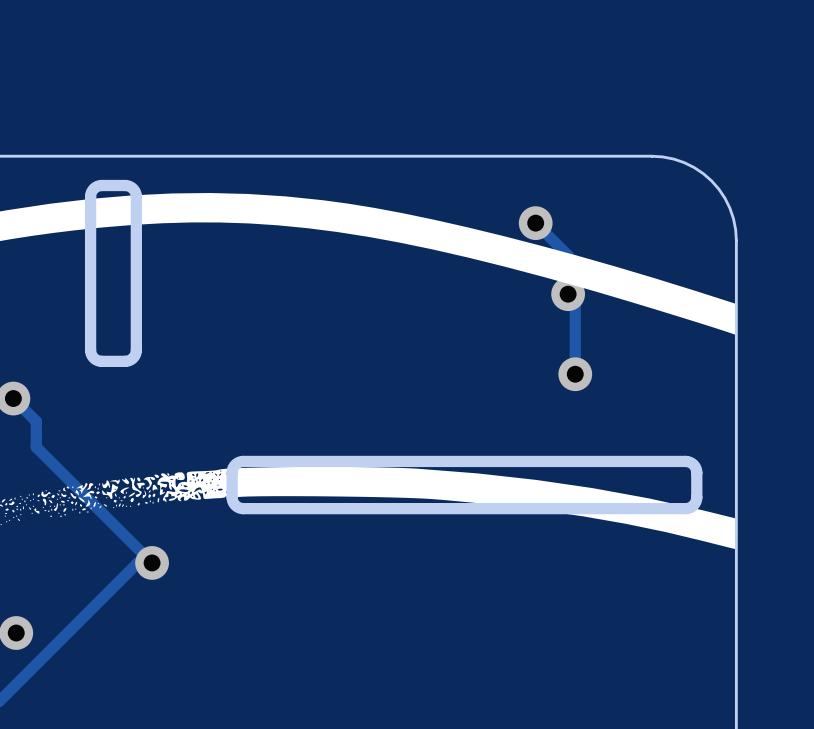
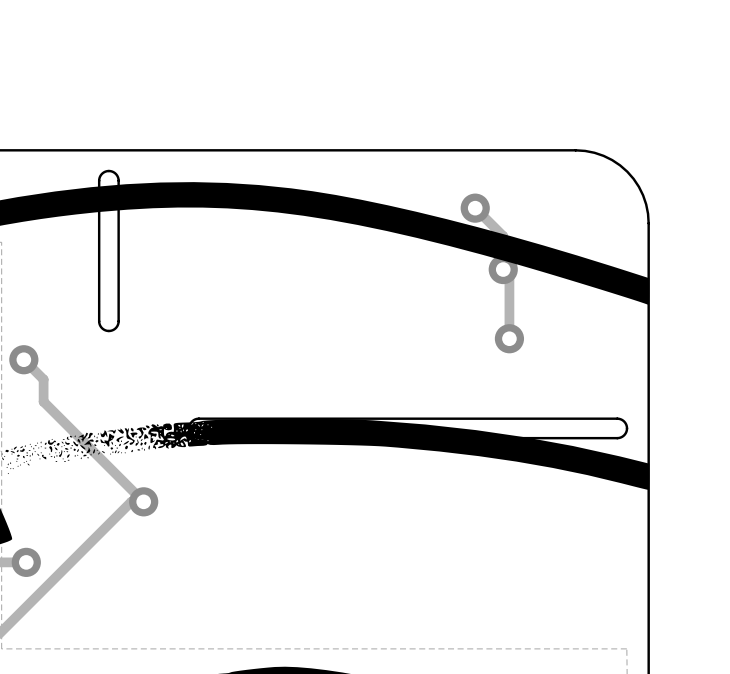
board edge: none -> (108, 171) (115, 173) (118, 180) (118, 321) (115, 328) (108, 331) (102, 328) (99, 321) (99, 180) (102, 173) (108, 171)
board edge: (125, 185) (98, 185) (92, 189) (90, 195) (90, 350) (92, 356) (100, 361) (128, 360) (133, 358) (136, 351) (136, 195) (131, 187) (125, 185) -> none
board edge: (685, 461) (241, 461) (236, 463) (232, 469) (232, 498) (236, 506) (243, 508) (687, 508) (693, 505) (696, 500) (696, 472) (693, 464) (685, 461) -> none
board edge: none -> (617, 418) (198, 418) (192, 421) (189, 428) (192, 435) (198, 438) (617, 438) (624, 435) (627, 428) (624, 421) (617, 418)

